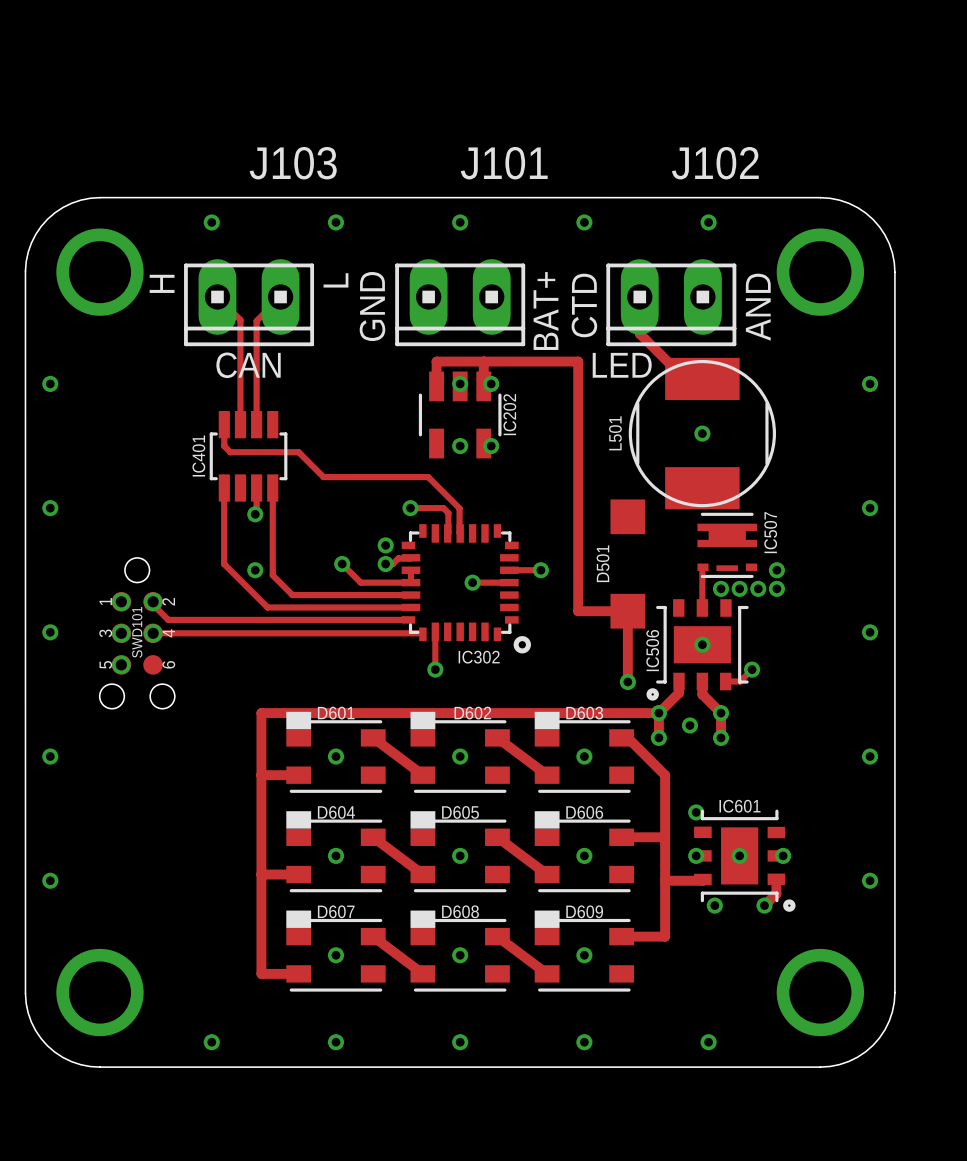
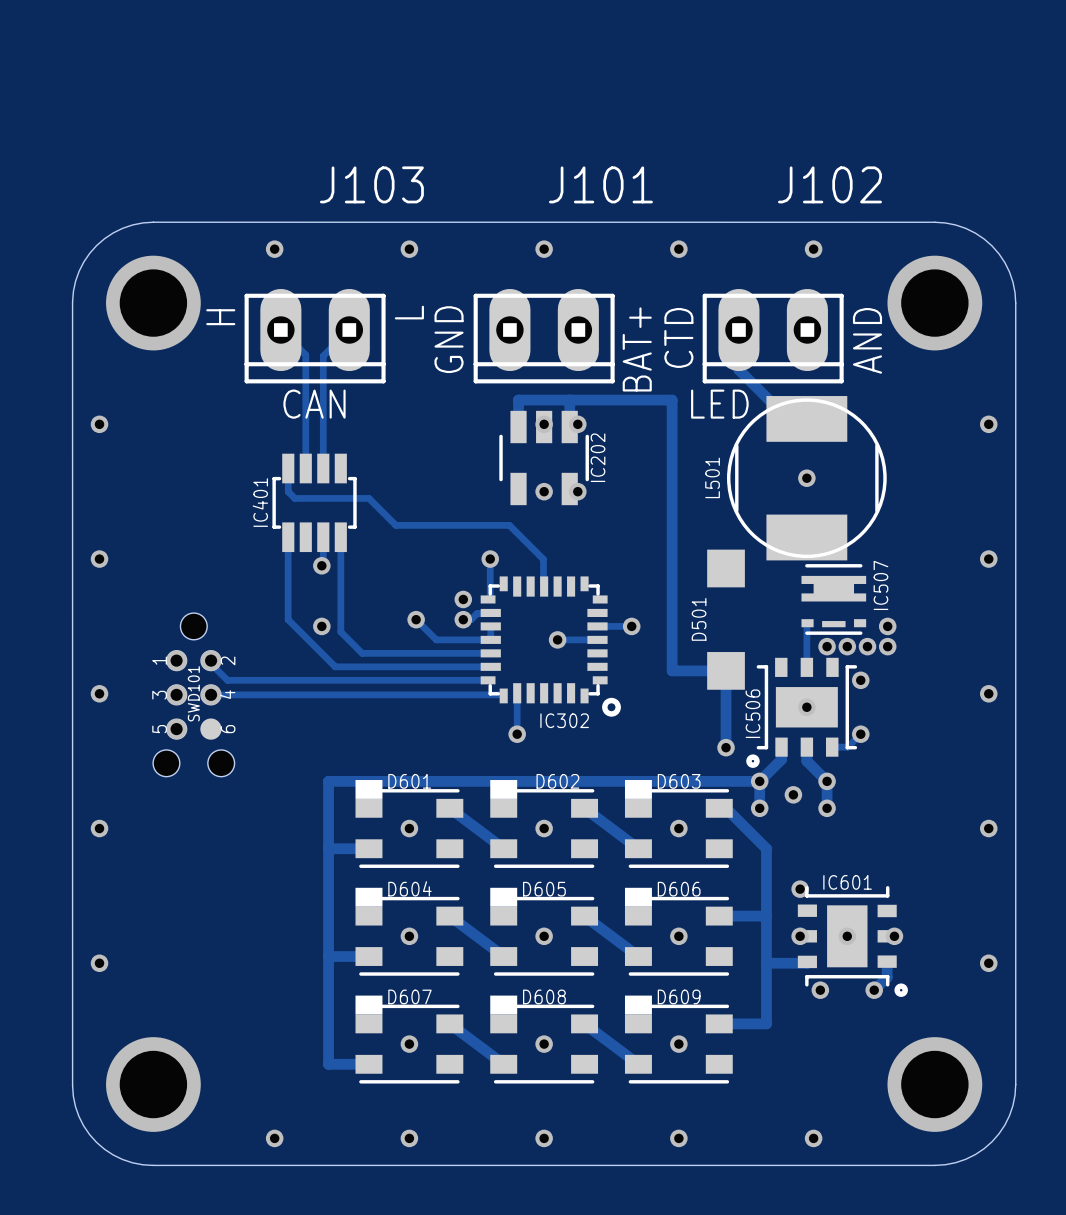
track: (410, 508) (443, 508) (448, 513) (447, 533) -> (490, 559) (490, 597) (488, 599)
via: none -> (860, 680)

